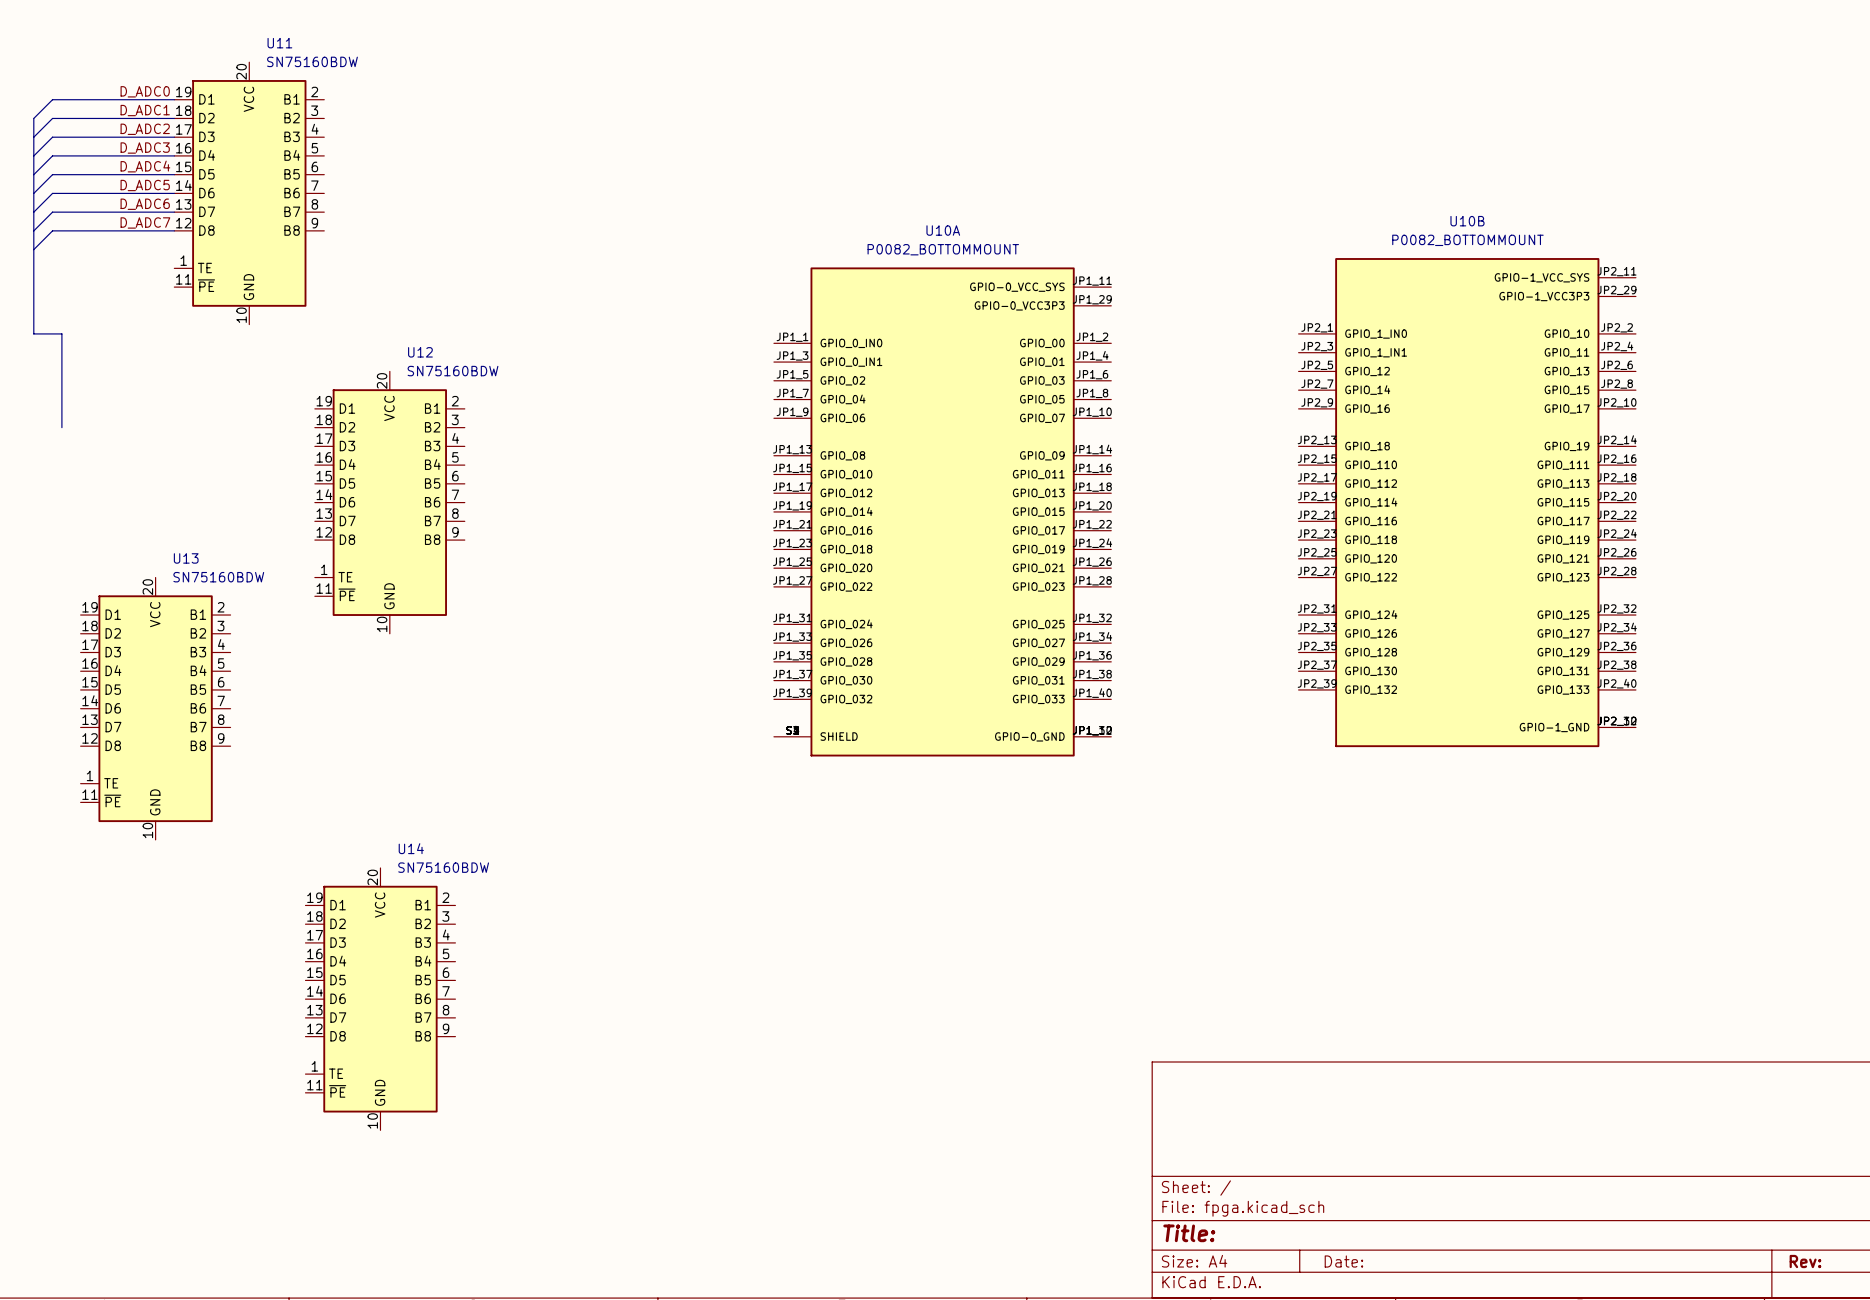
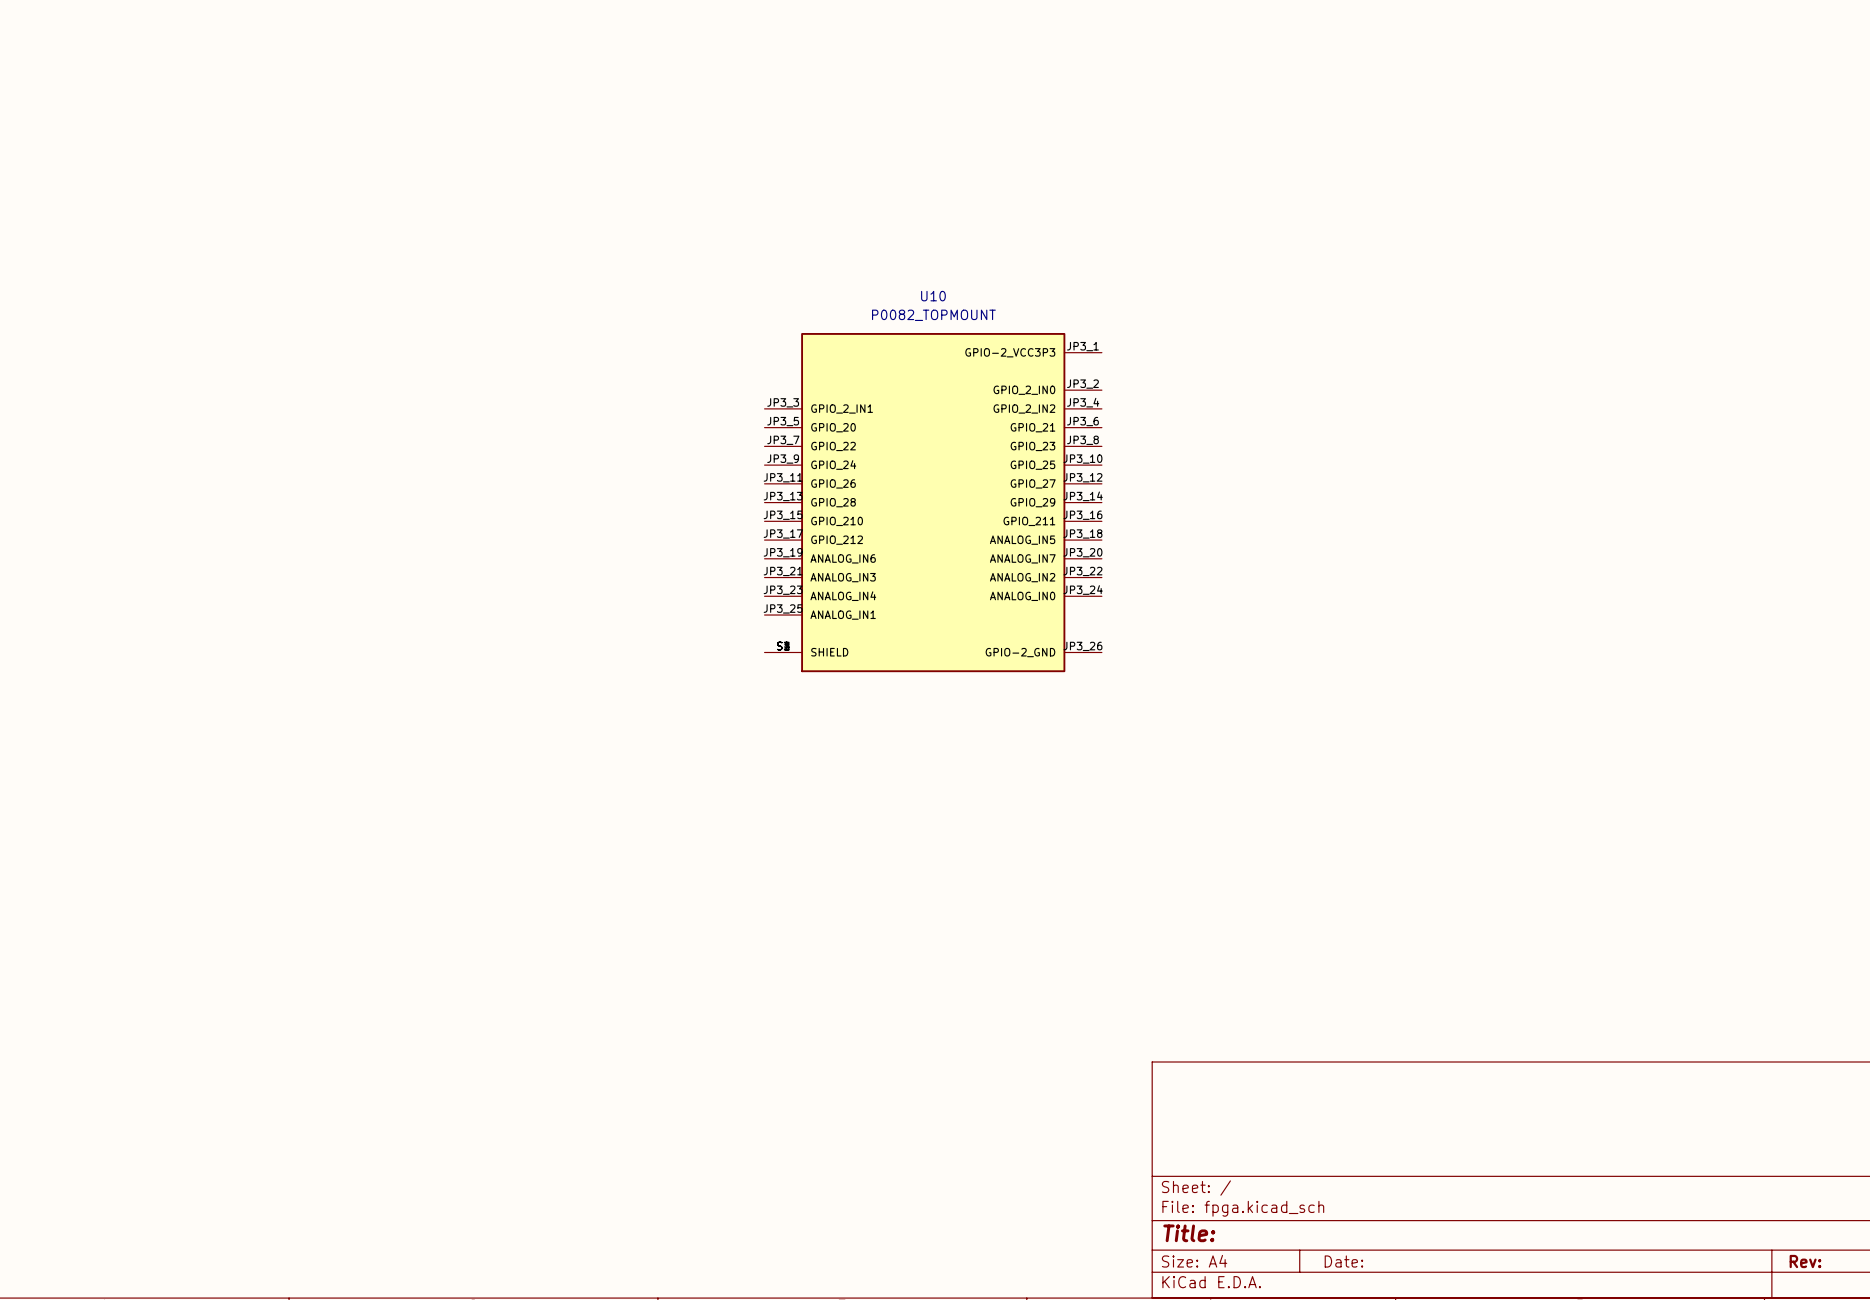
label: D_ADC0 (145, 91) -> none
wire: (174, 99) (52, 99) (33, 118) -> none
label: D_ADC1 (145, 110) -> none
bus: (33, 118) (33, 333) (61, 333) (61, 427) -> none
wire: (174, 118) (52, 118) (33, 137) -> none
label: D_ADC2 (145, 129) -> none
wire: (174, 137) (52, 137) (33, 155) -> none
label: D_ADC3 (145, 148) -> none
wire: (174, 155) (52, 155) (33, 174) -> none
label: D_ADC4 (145, 166) -> none
wire: (174, 174) (52, 174) (33, 193) -> none
label: D_ADC5 (145, 185) -> none
wire: (174, 193) (52, 193) (33, 212) -> none
U11: SN75160BDW (249, 193) -> none
label: D_ADC6 (145, 204) -> none
wire: (174, 212) (52, 212) (33, 230) -> none
label: D_ADC7 (145, 222) -> none
wire: (174, 230) (52, 230) (33, 249) -> none
U12: SN75160BDW (389, 502) -> none
U10: none -> P0082_TOPMOUNT (933, 502)
U10B: P0082_BOTTOMMOUNT (1467, 502) -> none
U10A: P0082_BOTTOMMOUNT (942, 511) -> none
U13: SN75160BDW (155, 708) -> none
U14: SN75160BDW (380, 999) -> none

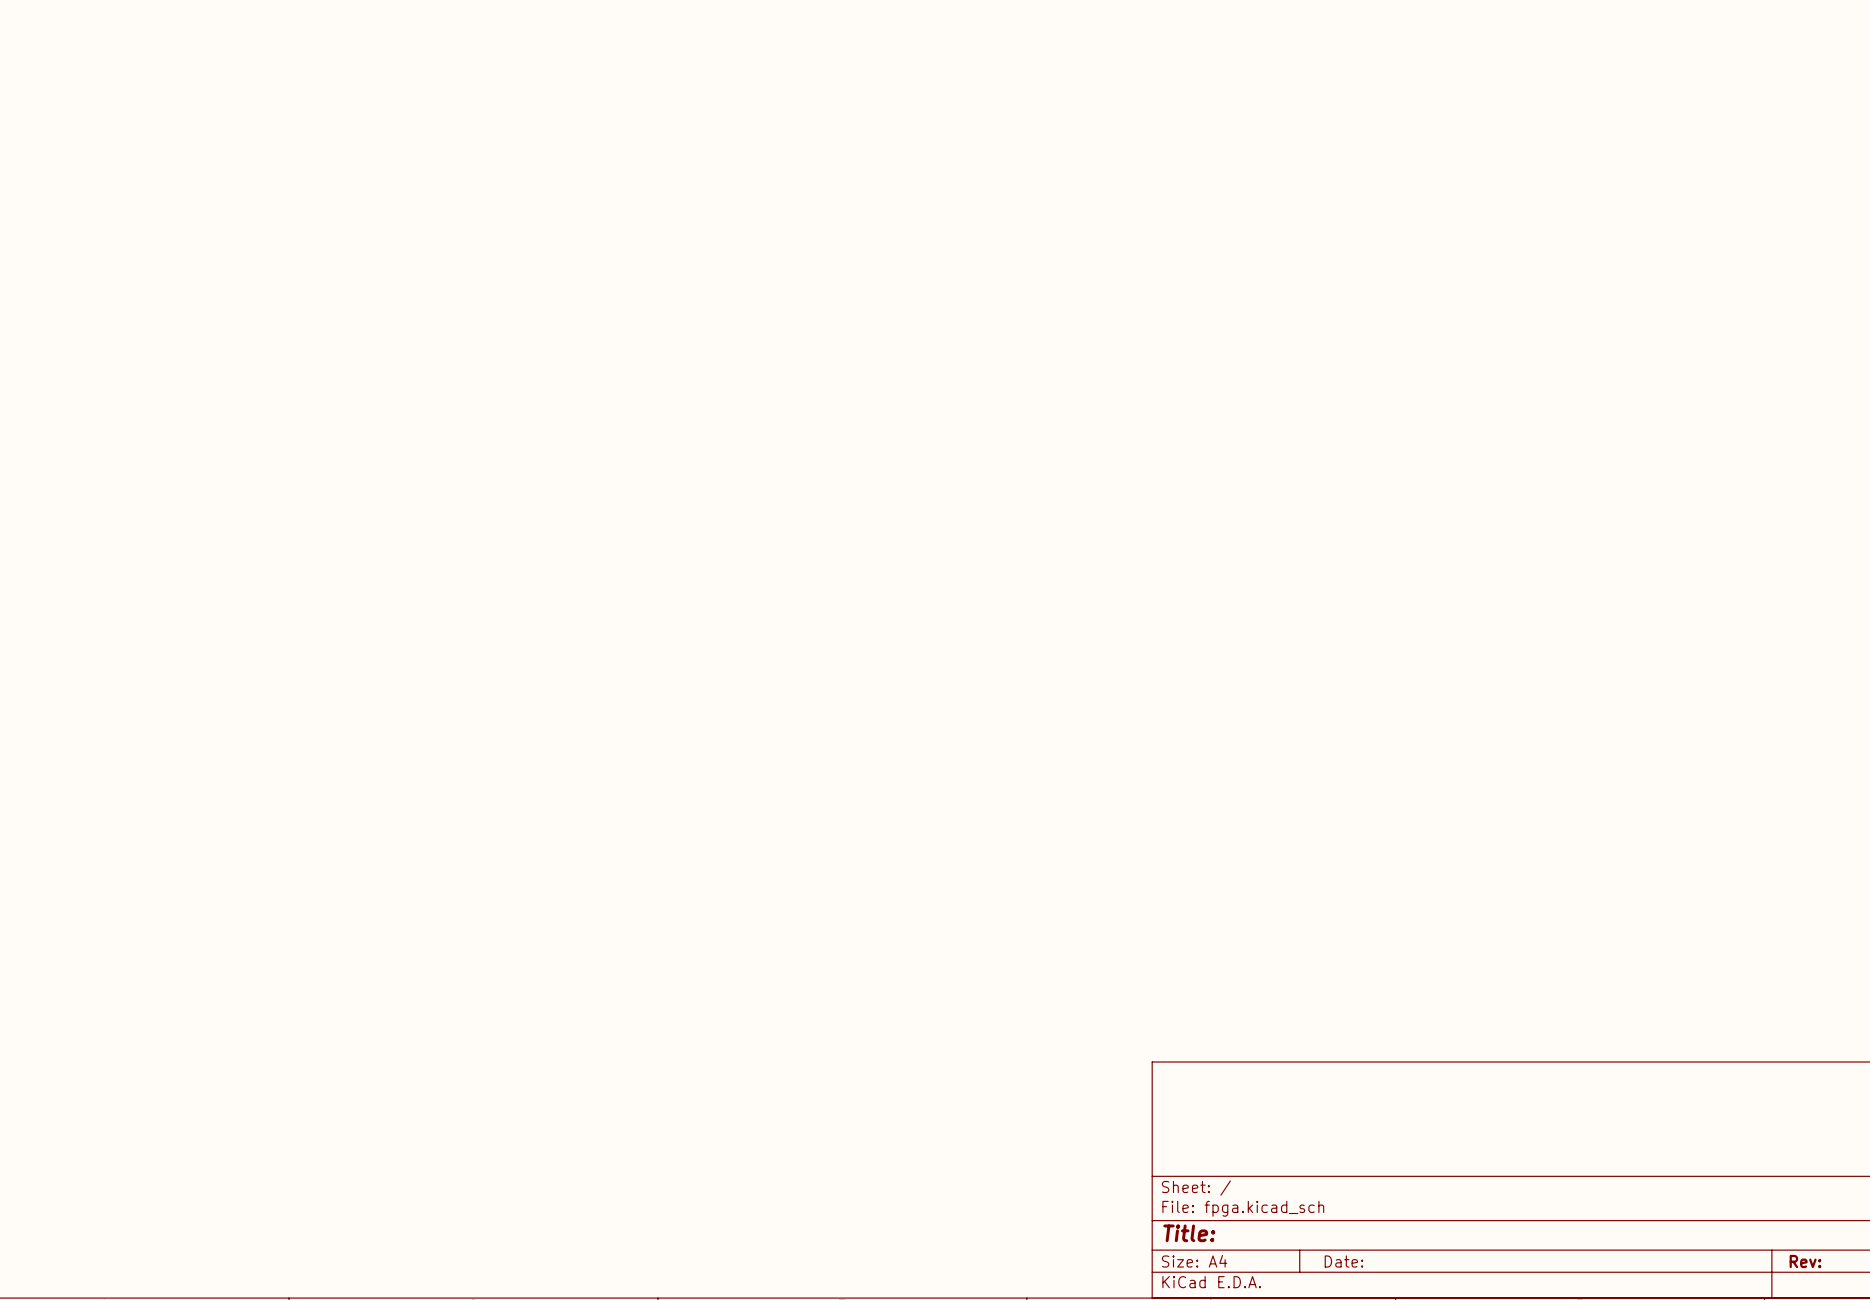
U10: P0082_TOPMOUNT (933, 502) -> none

